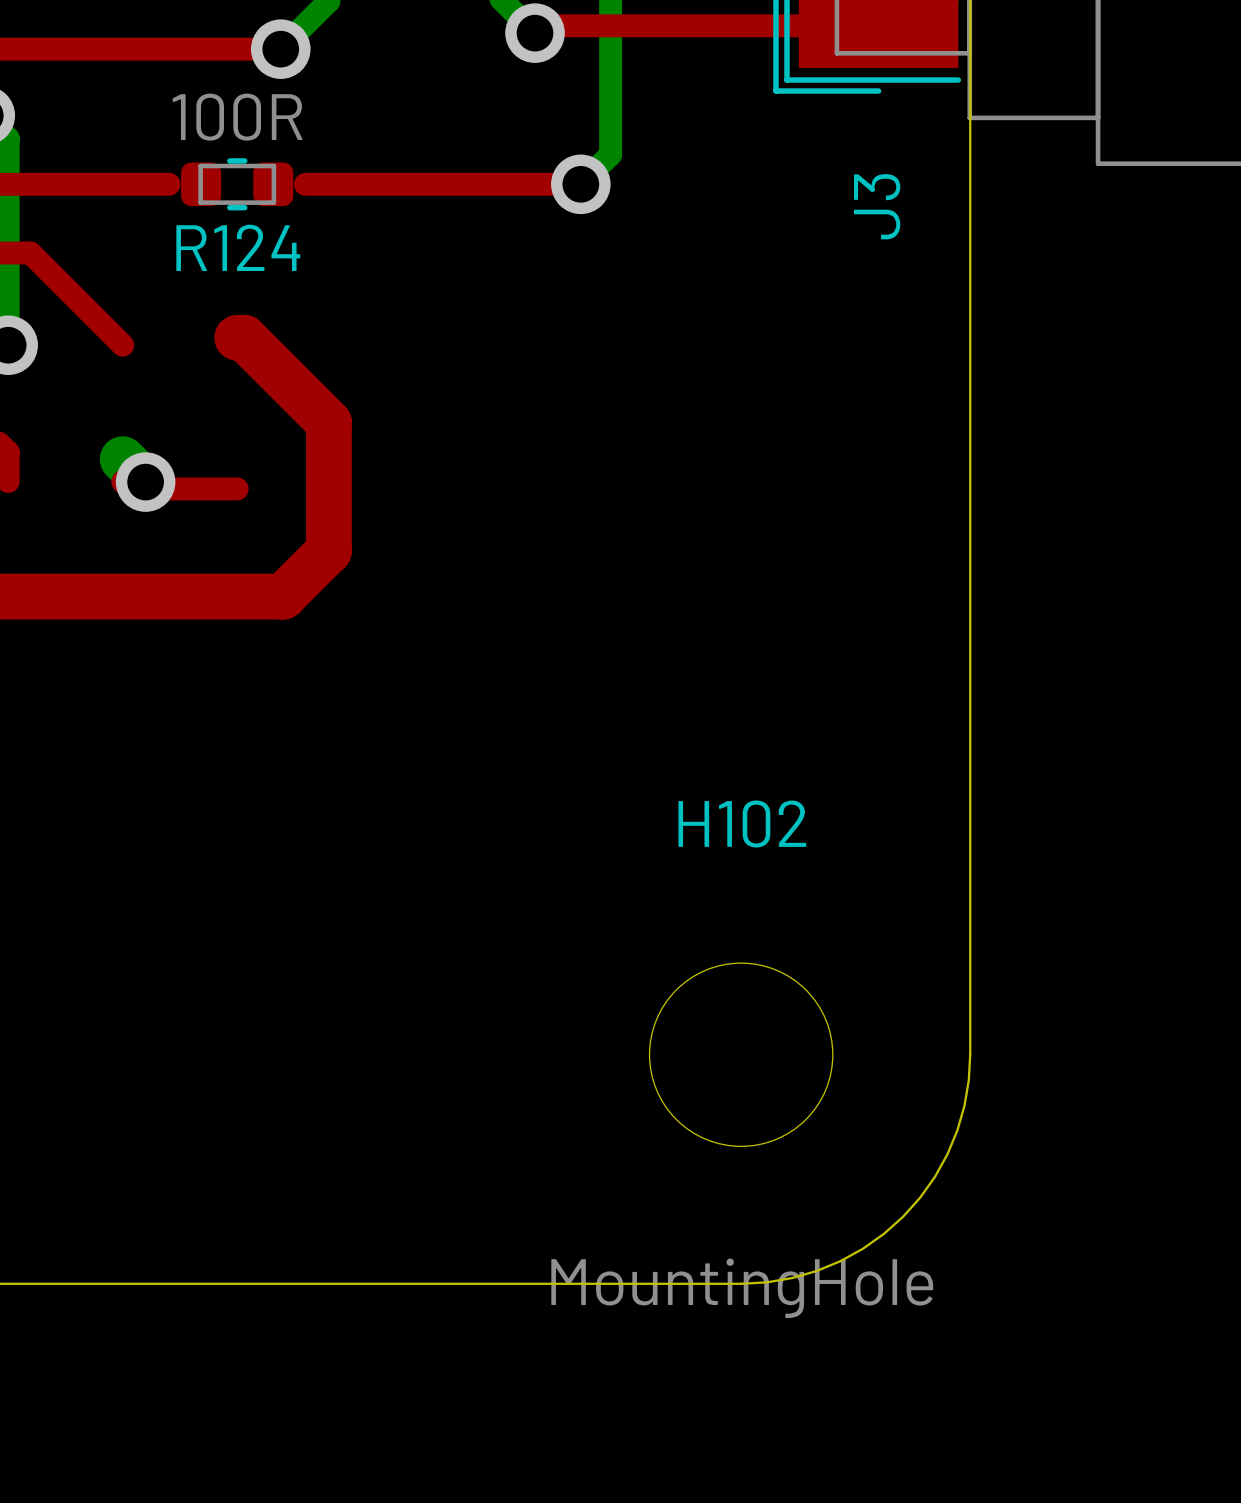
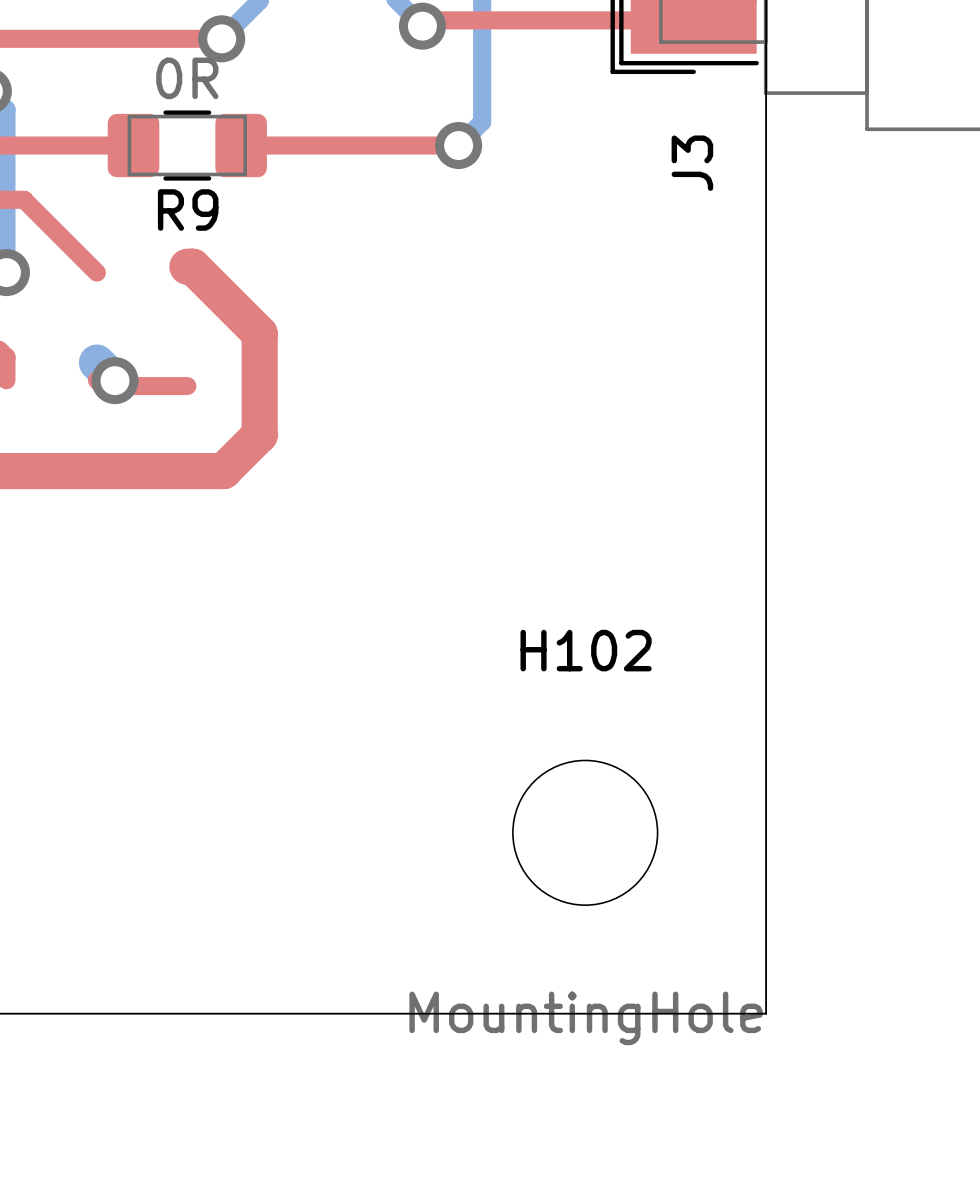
R124: 100R (237, 184) -> none
R9: none -> 0R (187, 145)
board edge: (970, 1054) (968, 1080) (957, 1130) (935, 1176) (903, 1216) (863, 1248) (816, 1270) (766, 1282) (741, 1283) -> (766, 832) (766, 1013) (585, 1013)

